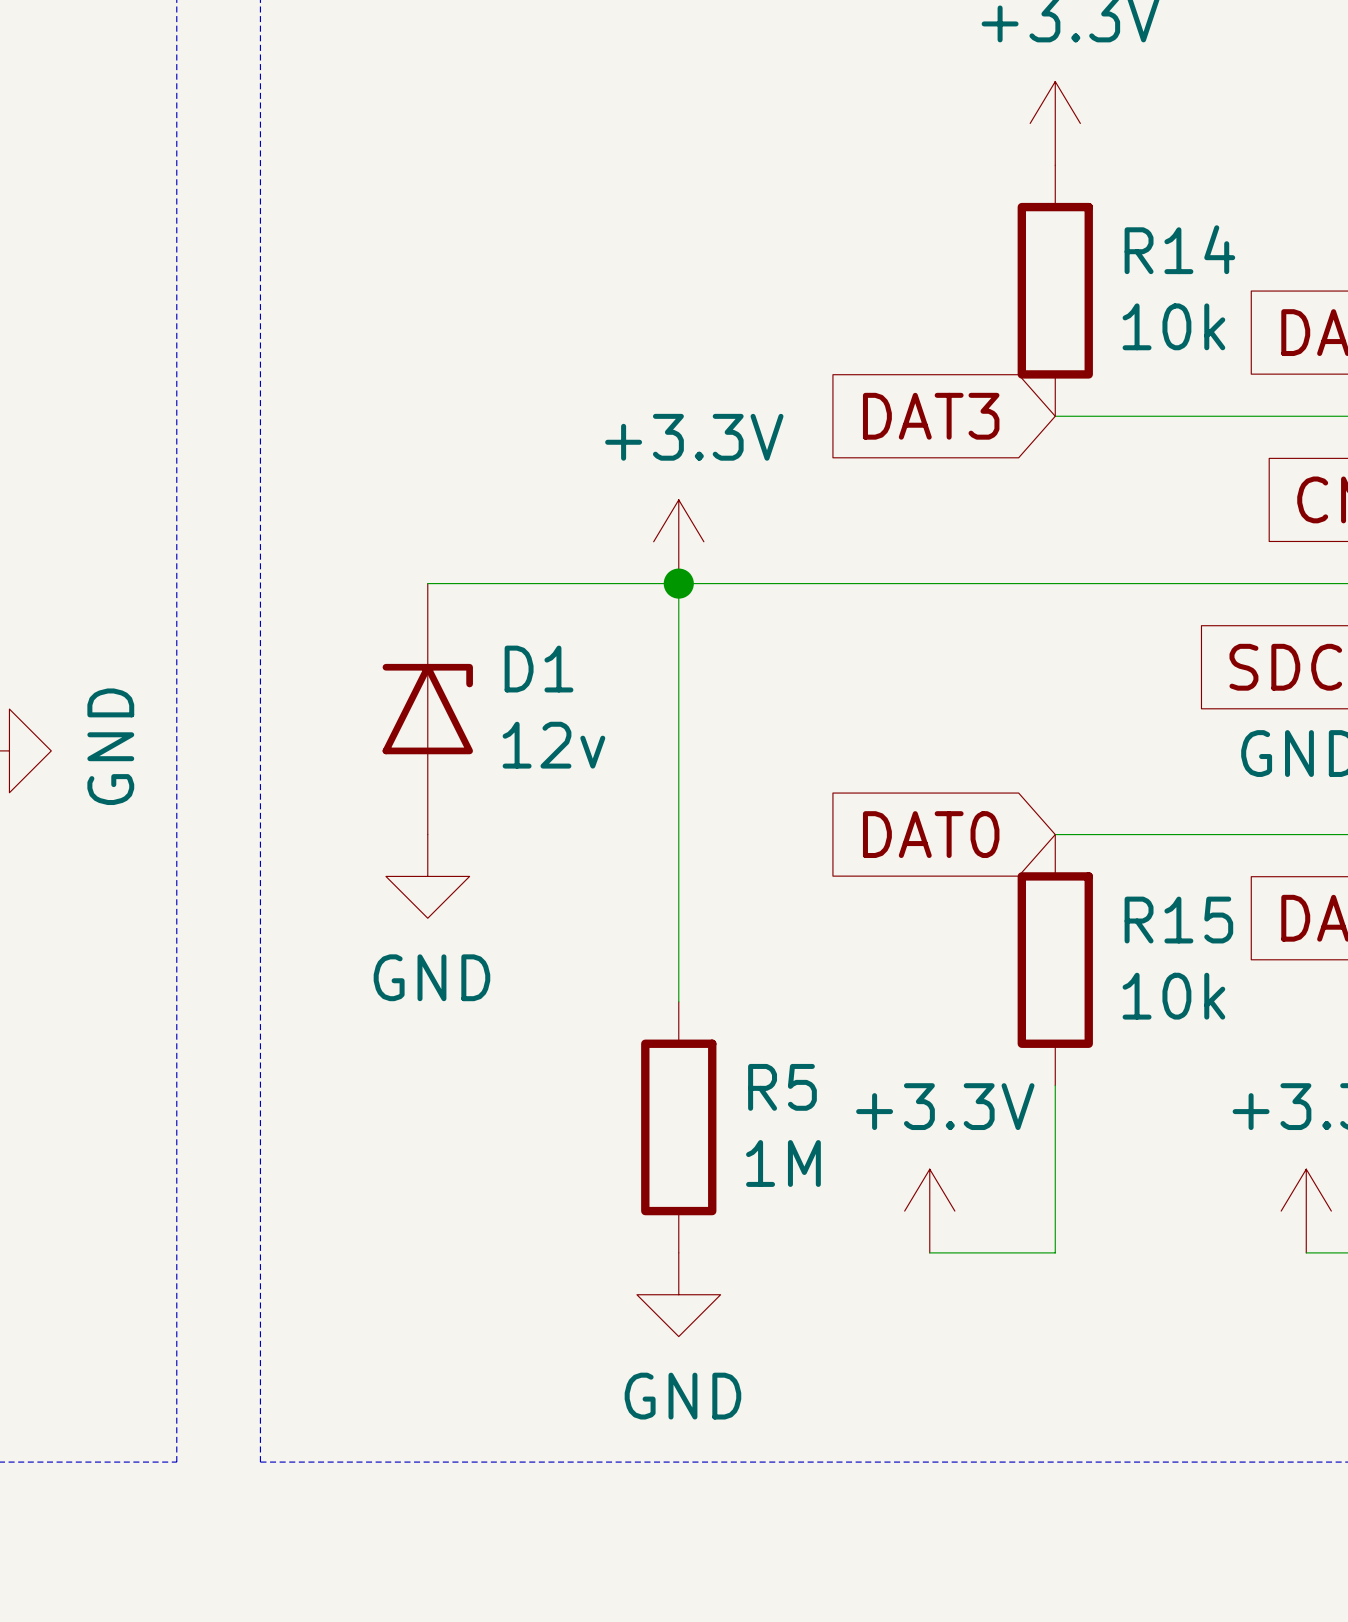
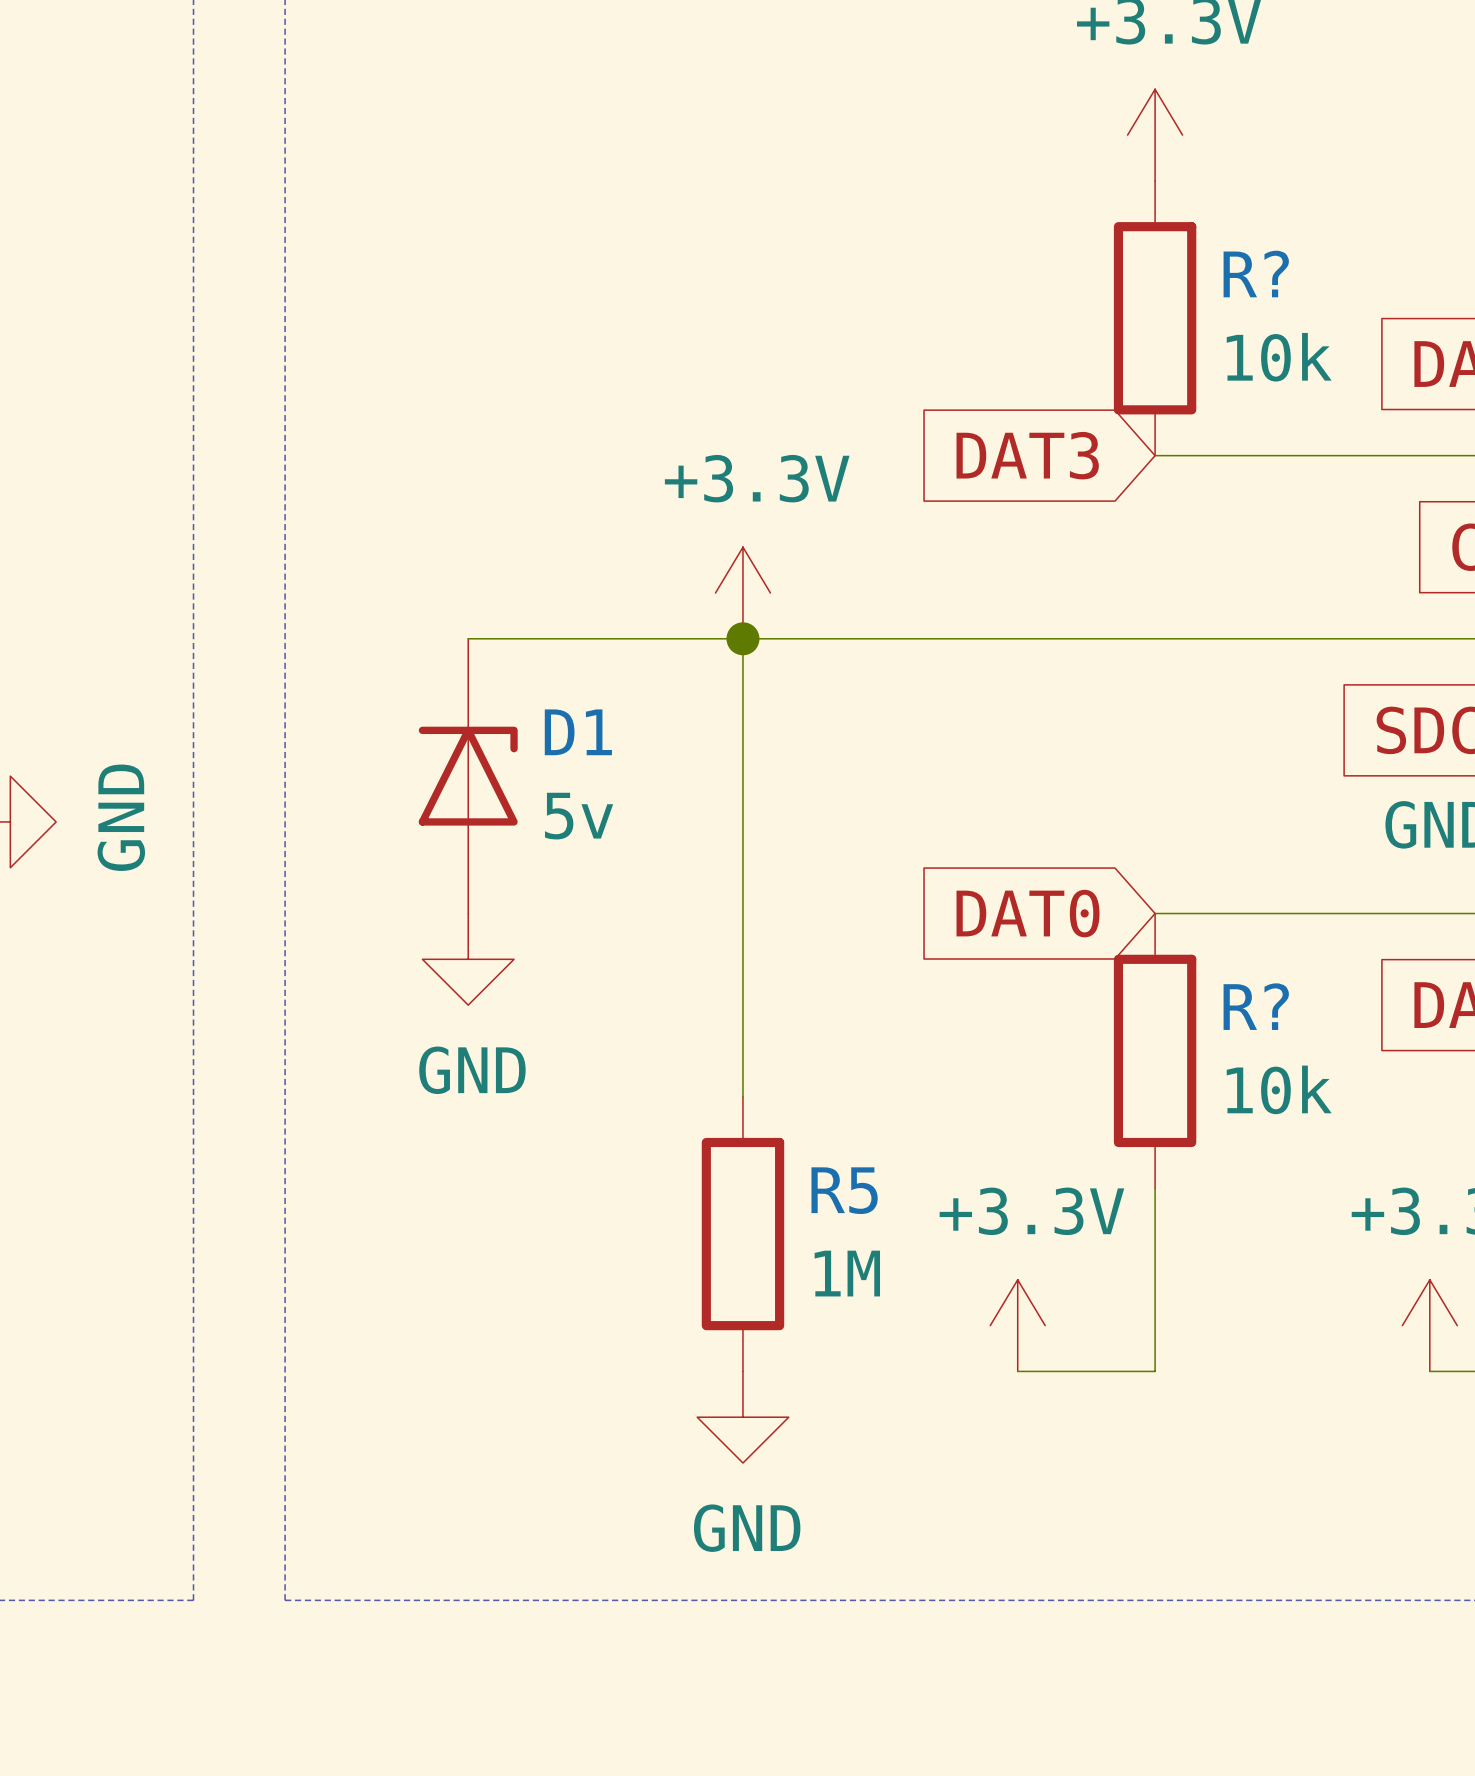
R14 name: R14 (1179, 249) -> R? (1256, 274)
D1 value: 12v (553, 745) -> 5v (579, 816)
R15 name: R15 (1178, 920) -> R? (1256, 1006)

